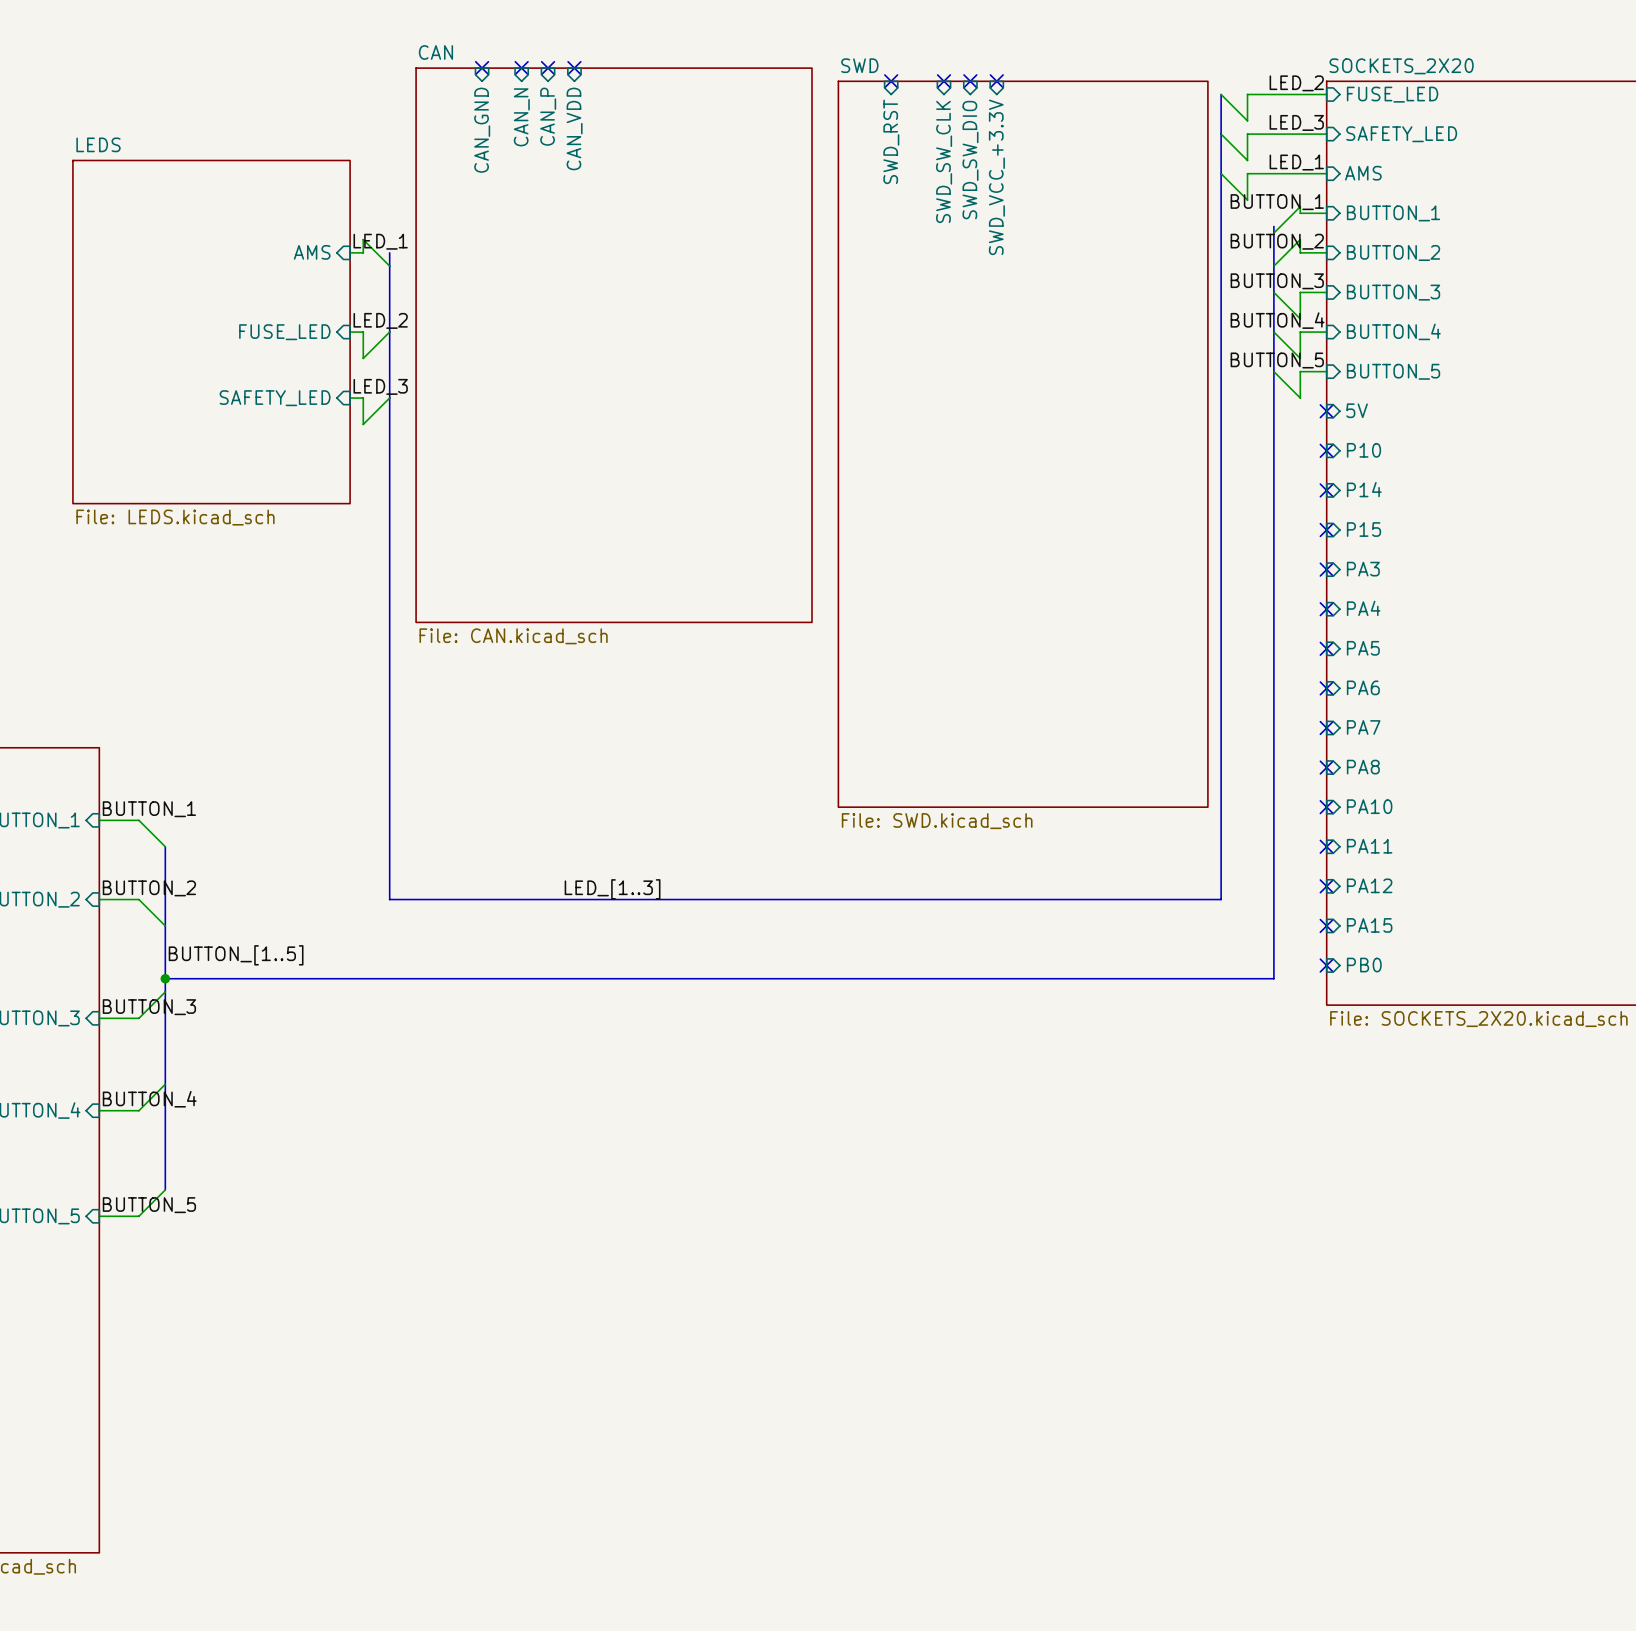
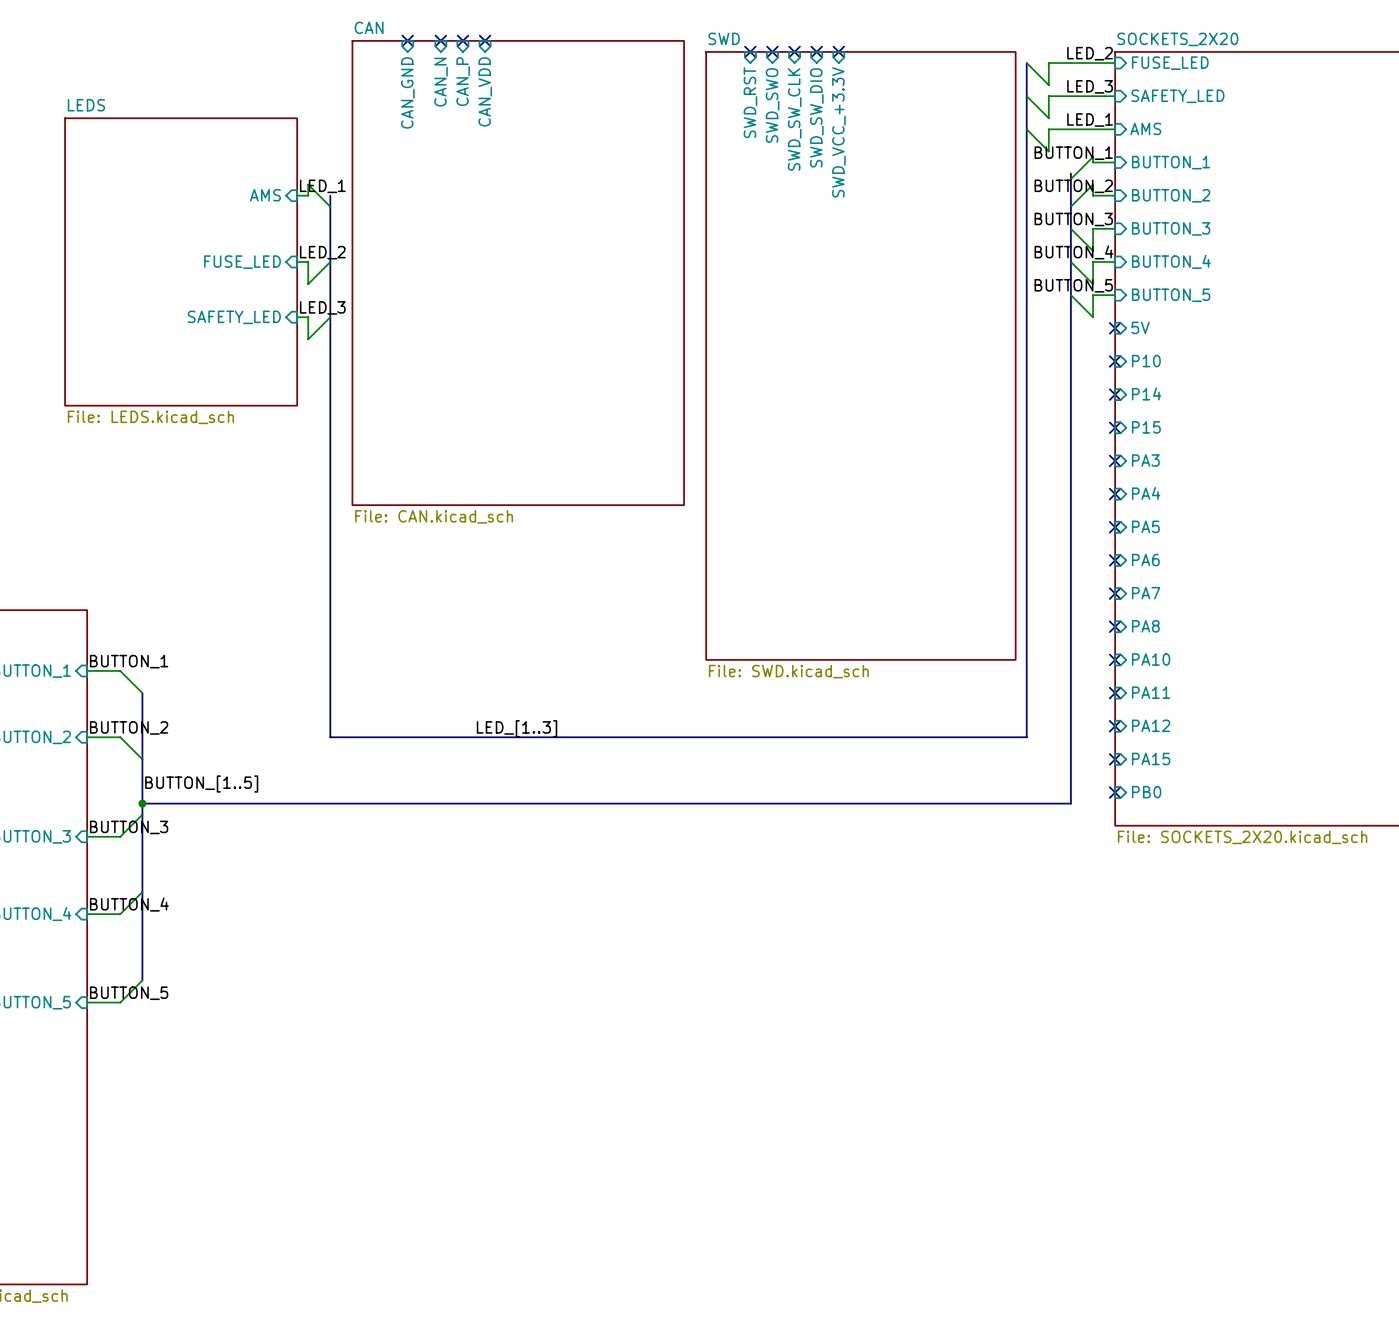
no-connect mark: none -> (772, 51)
sheet pin: none -> SWD_SWO (772, 105)

